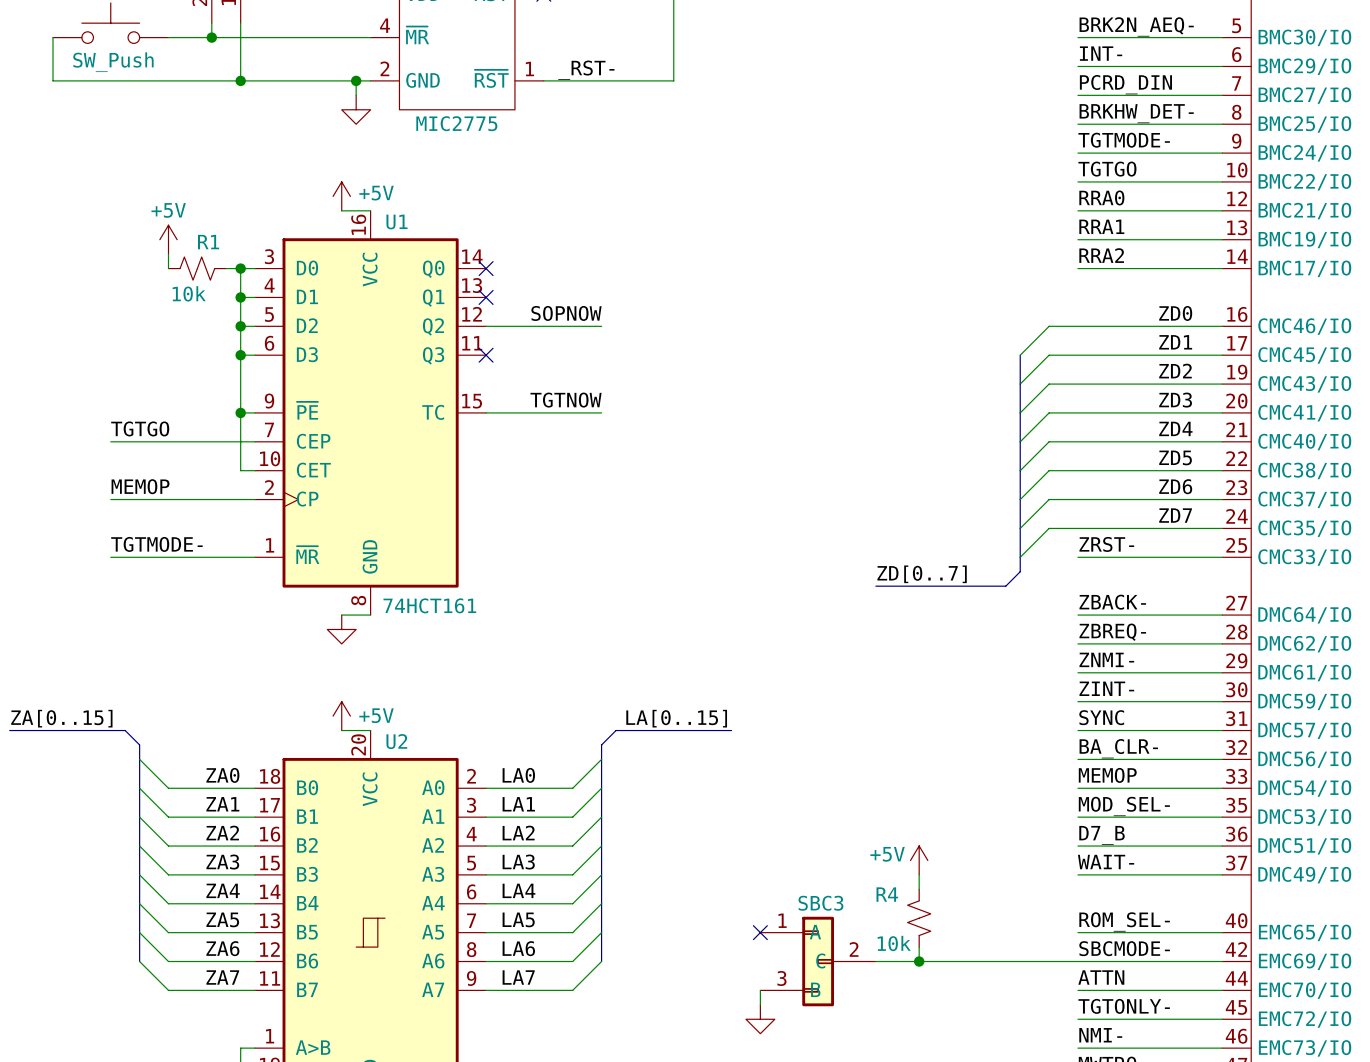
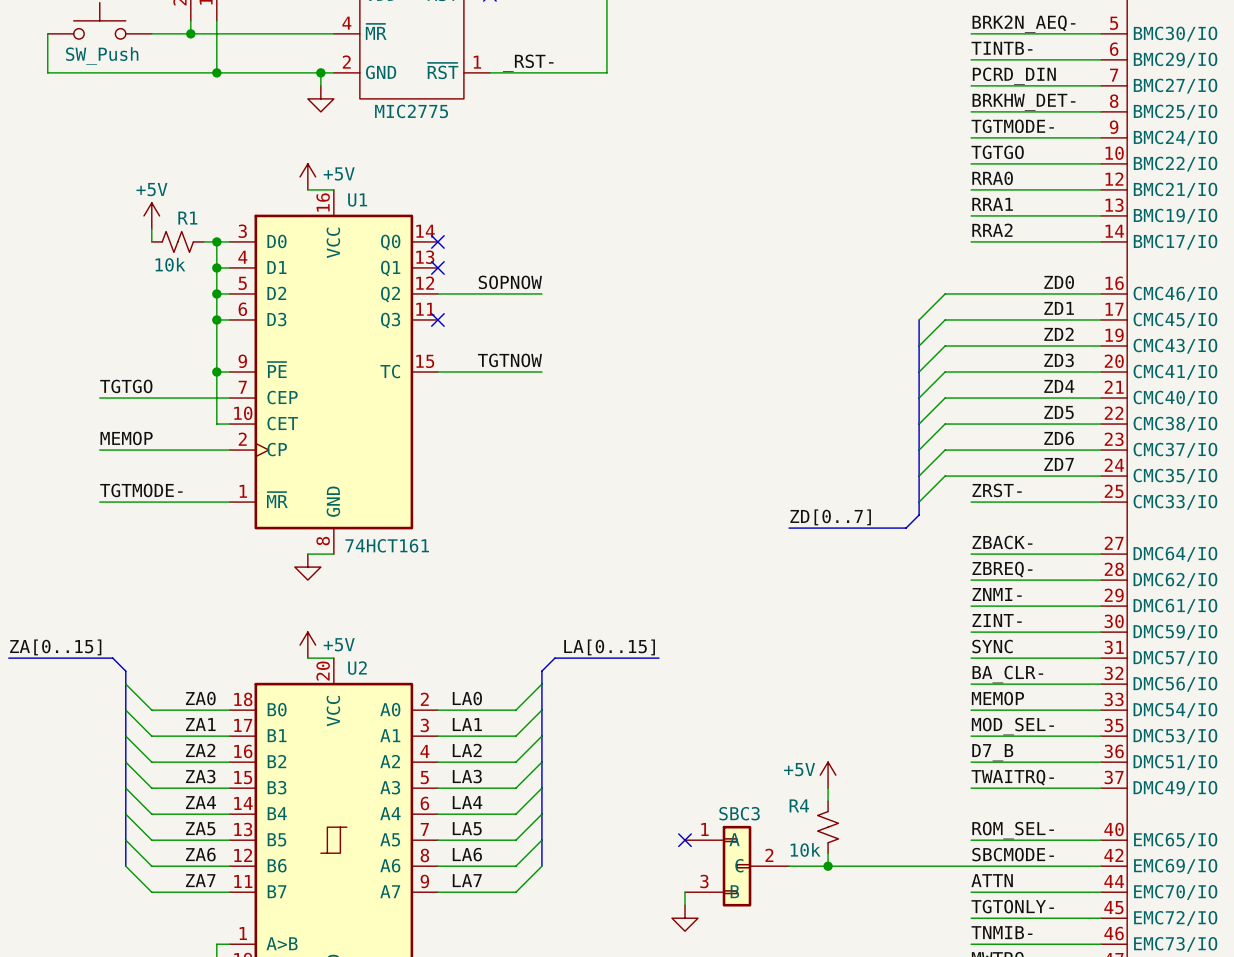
label: INT- (1101, 53) -> TINTB- (1001, 48)
label: WAIT- (1106, 862) -> TWAITRQ- (1012, 777)
label: NMI- (1100, 1035) -> TNMIB- (1001, 932)

